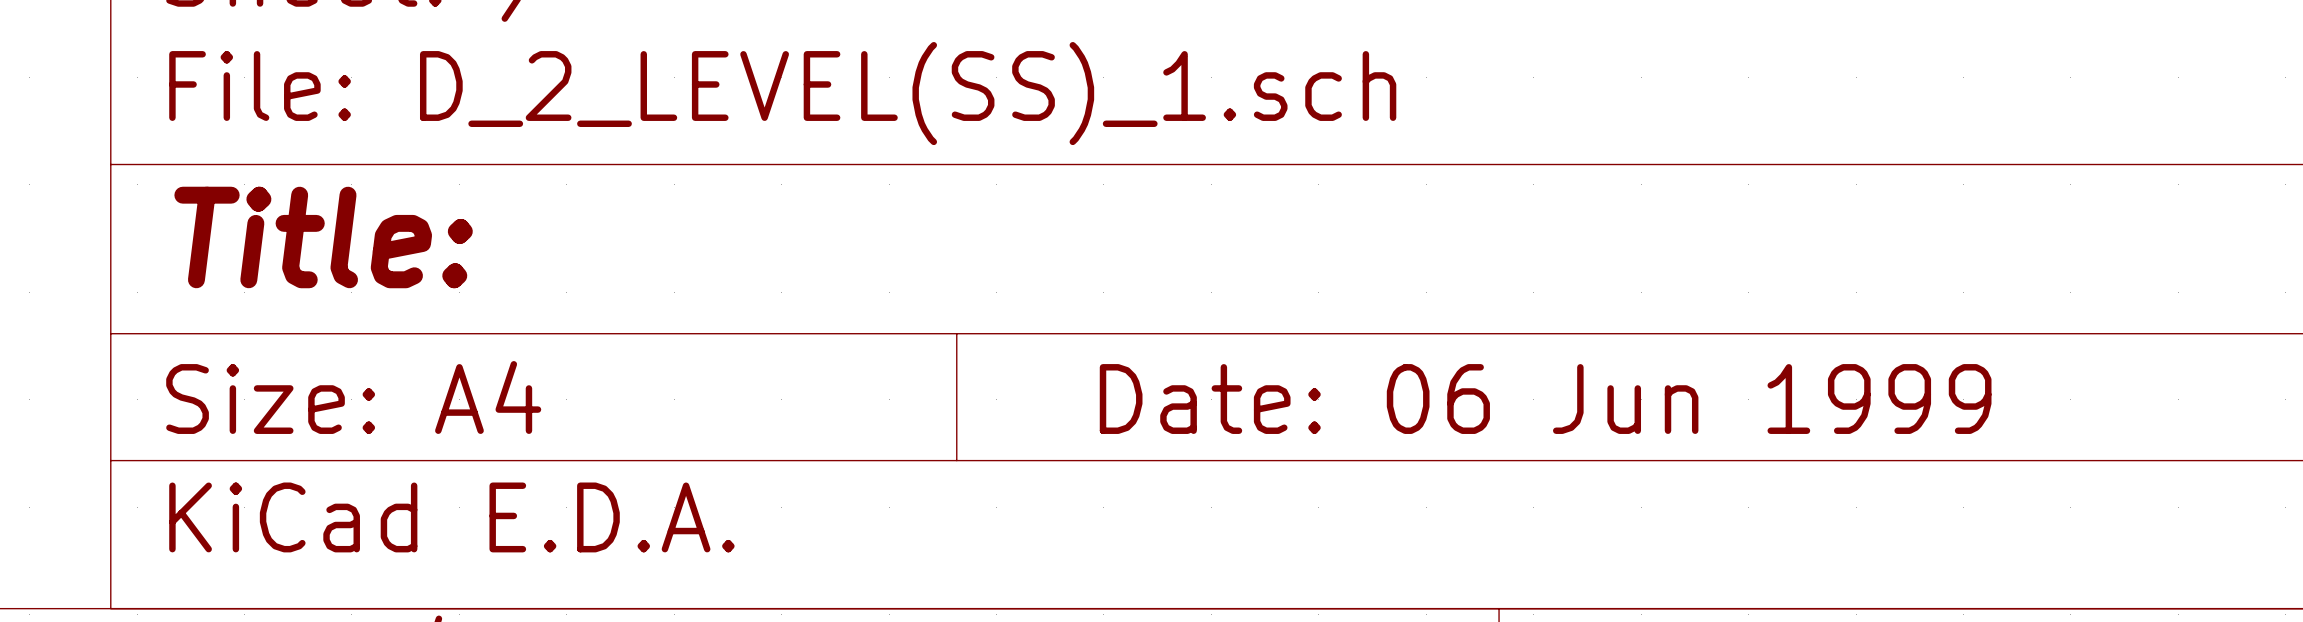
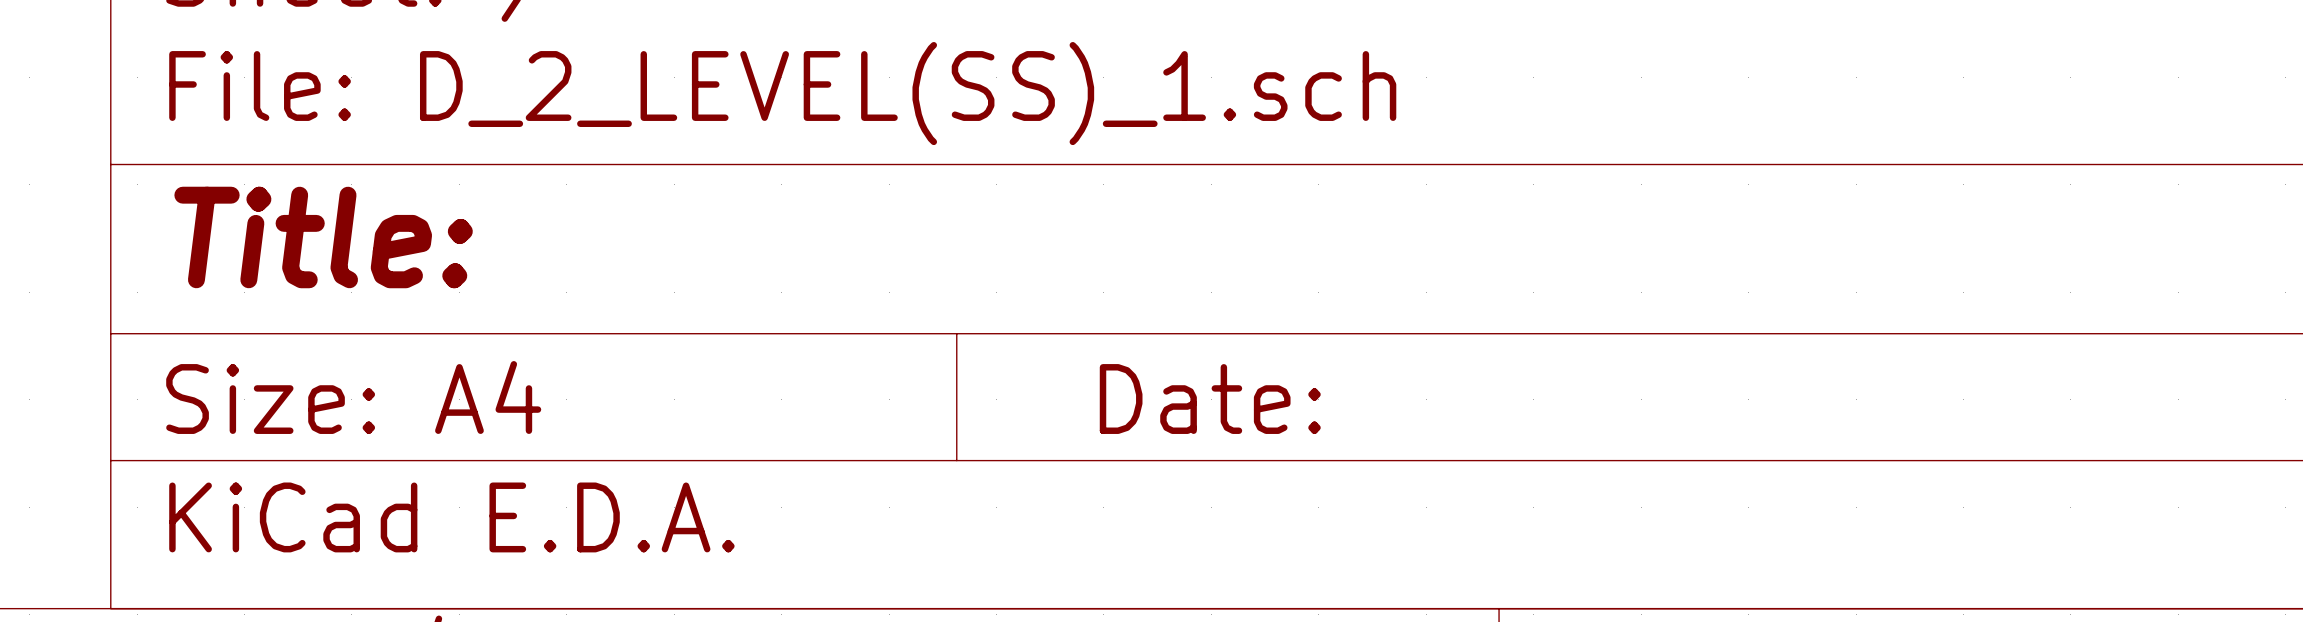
title block: Date: 06 Jun 1999 (1545, 399) -> Date: (1210, 399)

